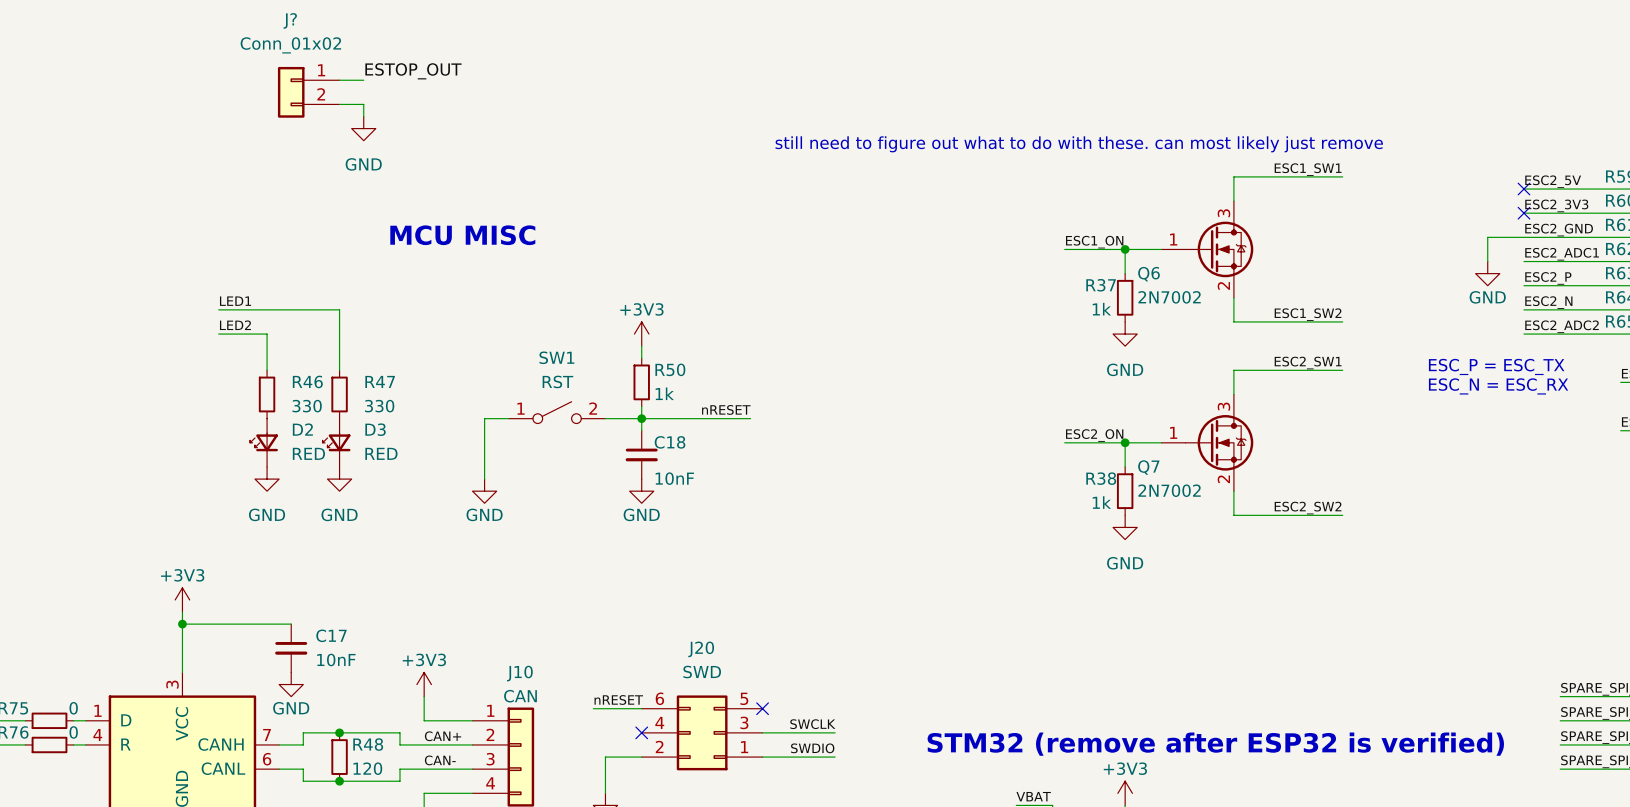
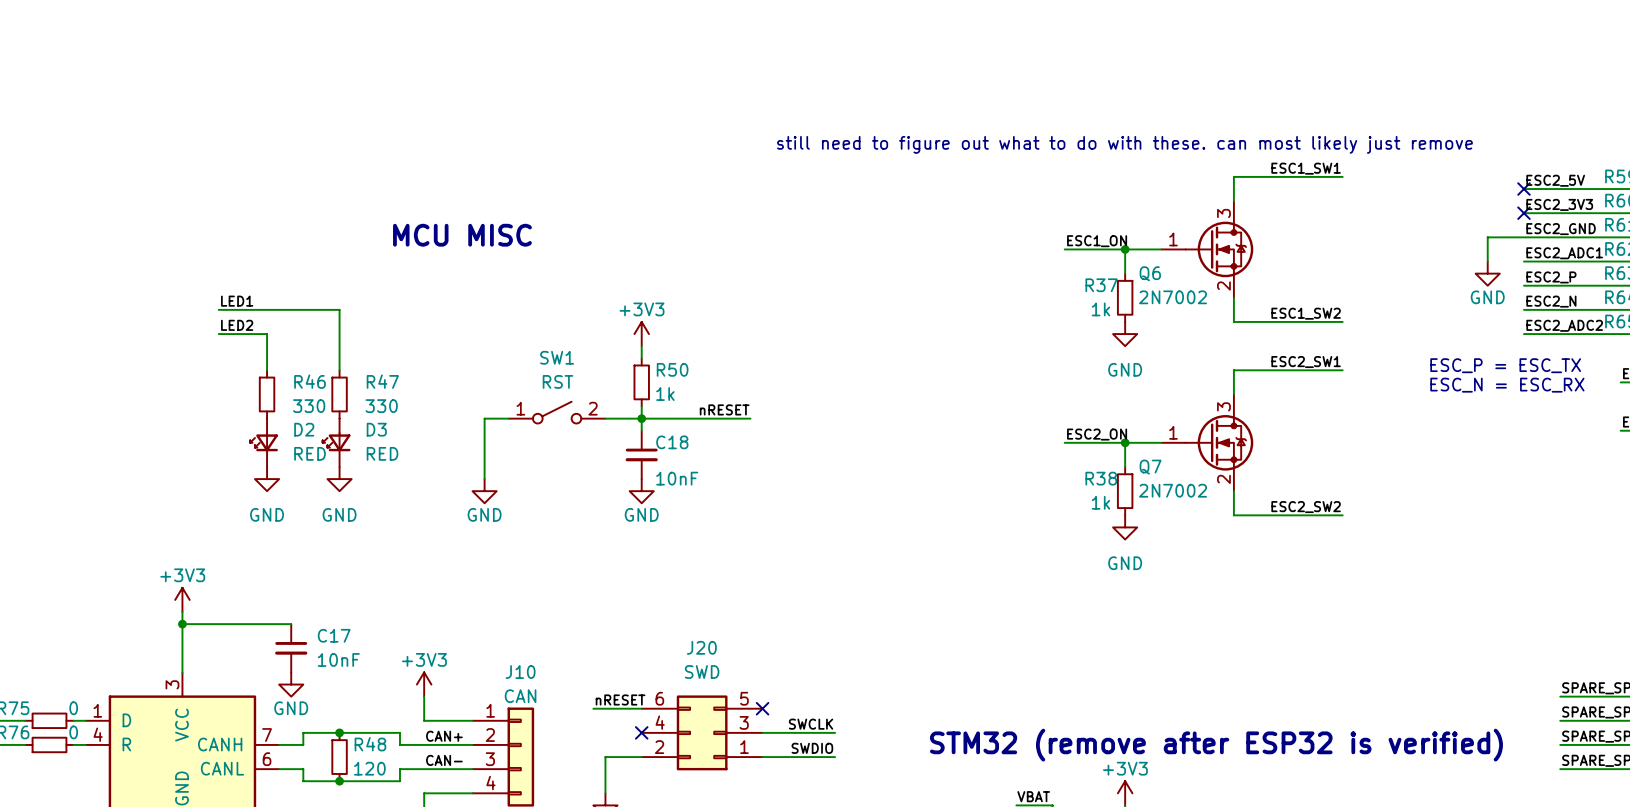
label: ESTOP_OUT (413, 71) -> none
wire: (339, 80) (363, 80) -> none
J?: Conn_01x02 (308, 92) -> none
wire: (339, 104) (363, 104) (363, 116) -> none
power symbol: GND (363, 128) -> none

